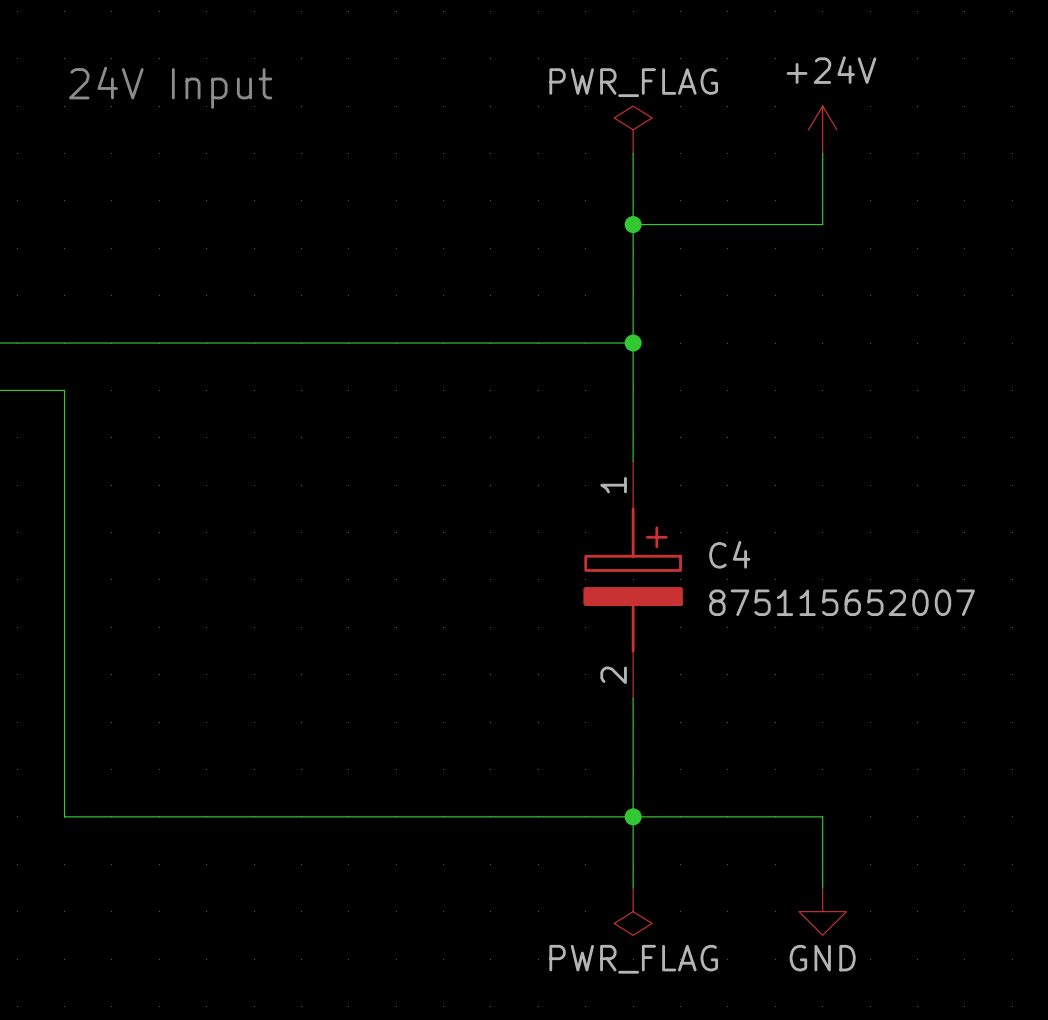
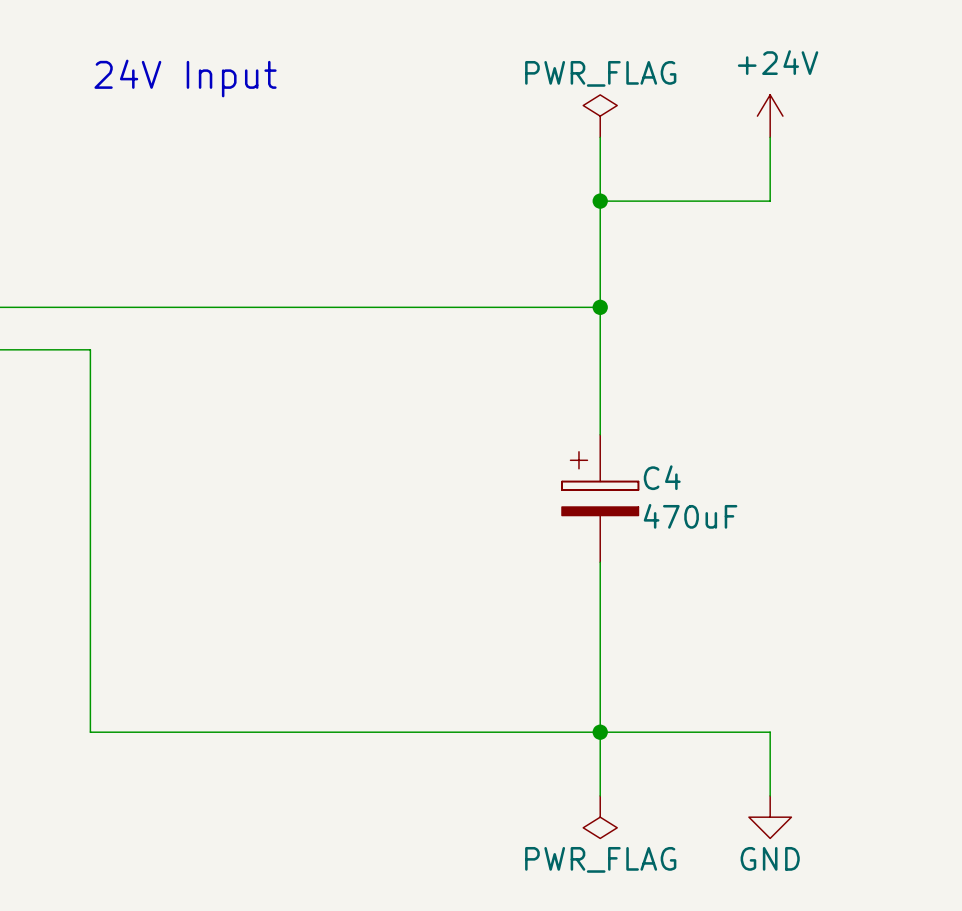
C4 symbol: [583, 461, 683, 699] -> [561, 434, 639, 563]
C4 value: 875115652007 (842, 602) -> 470uF (690, 516)

